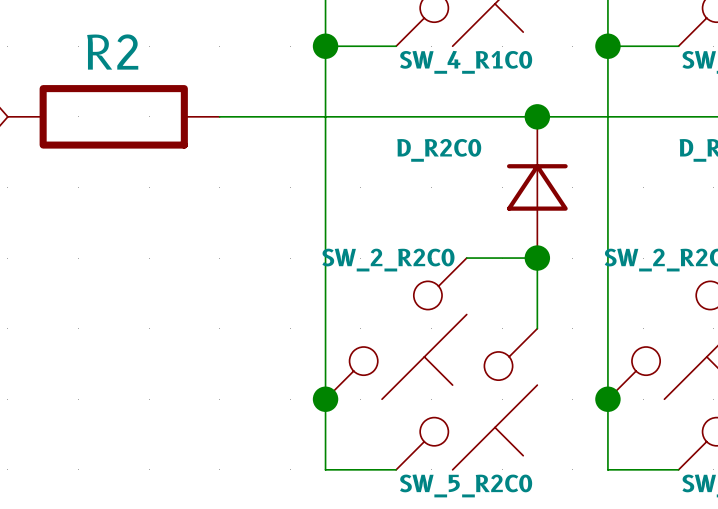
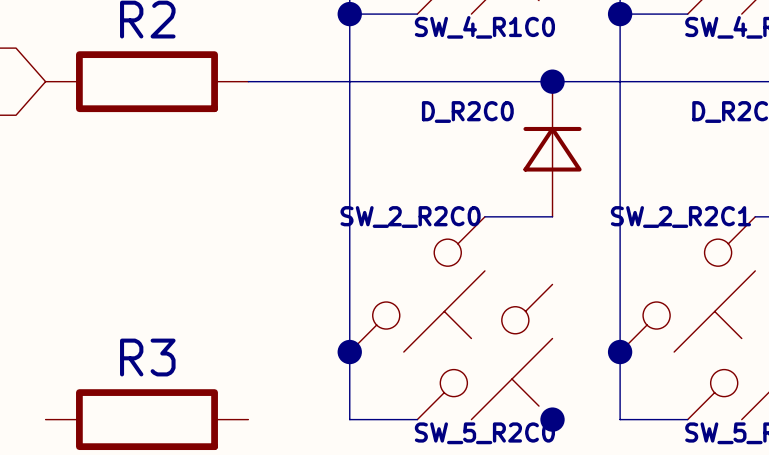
wire: (537, 258) (537, 328) -> none
junction: (537, 258) -> none
R3: none -> (146, 419)
junction: none -> (552, 419)

